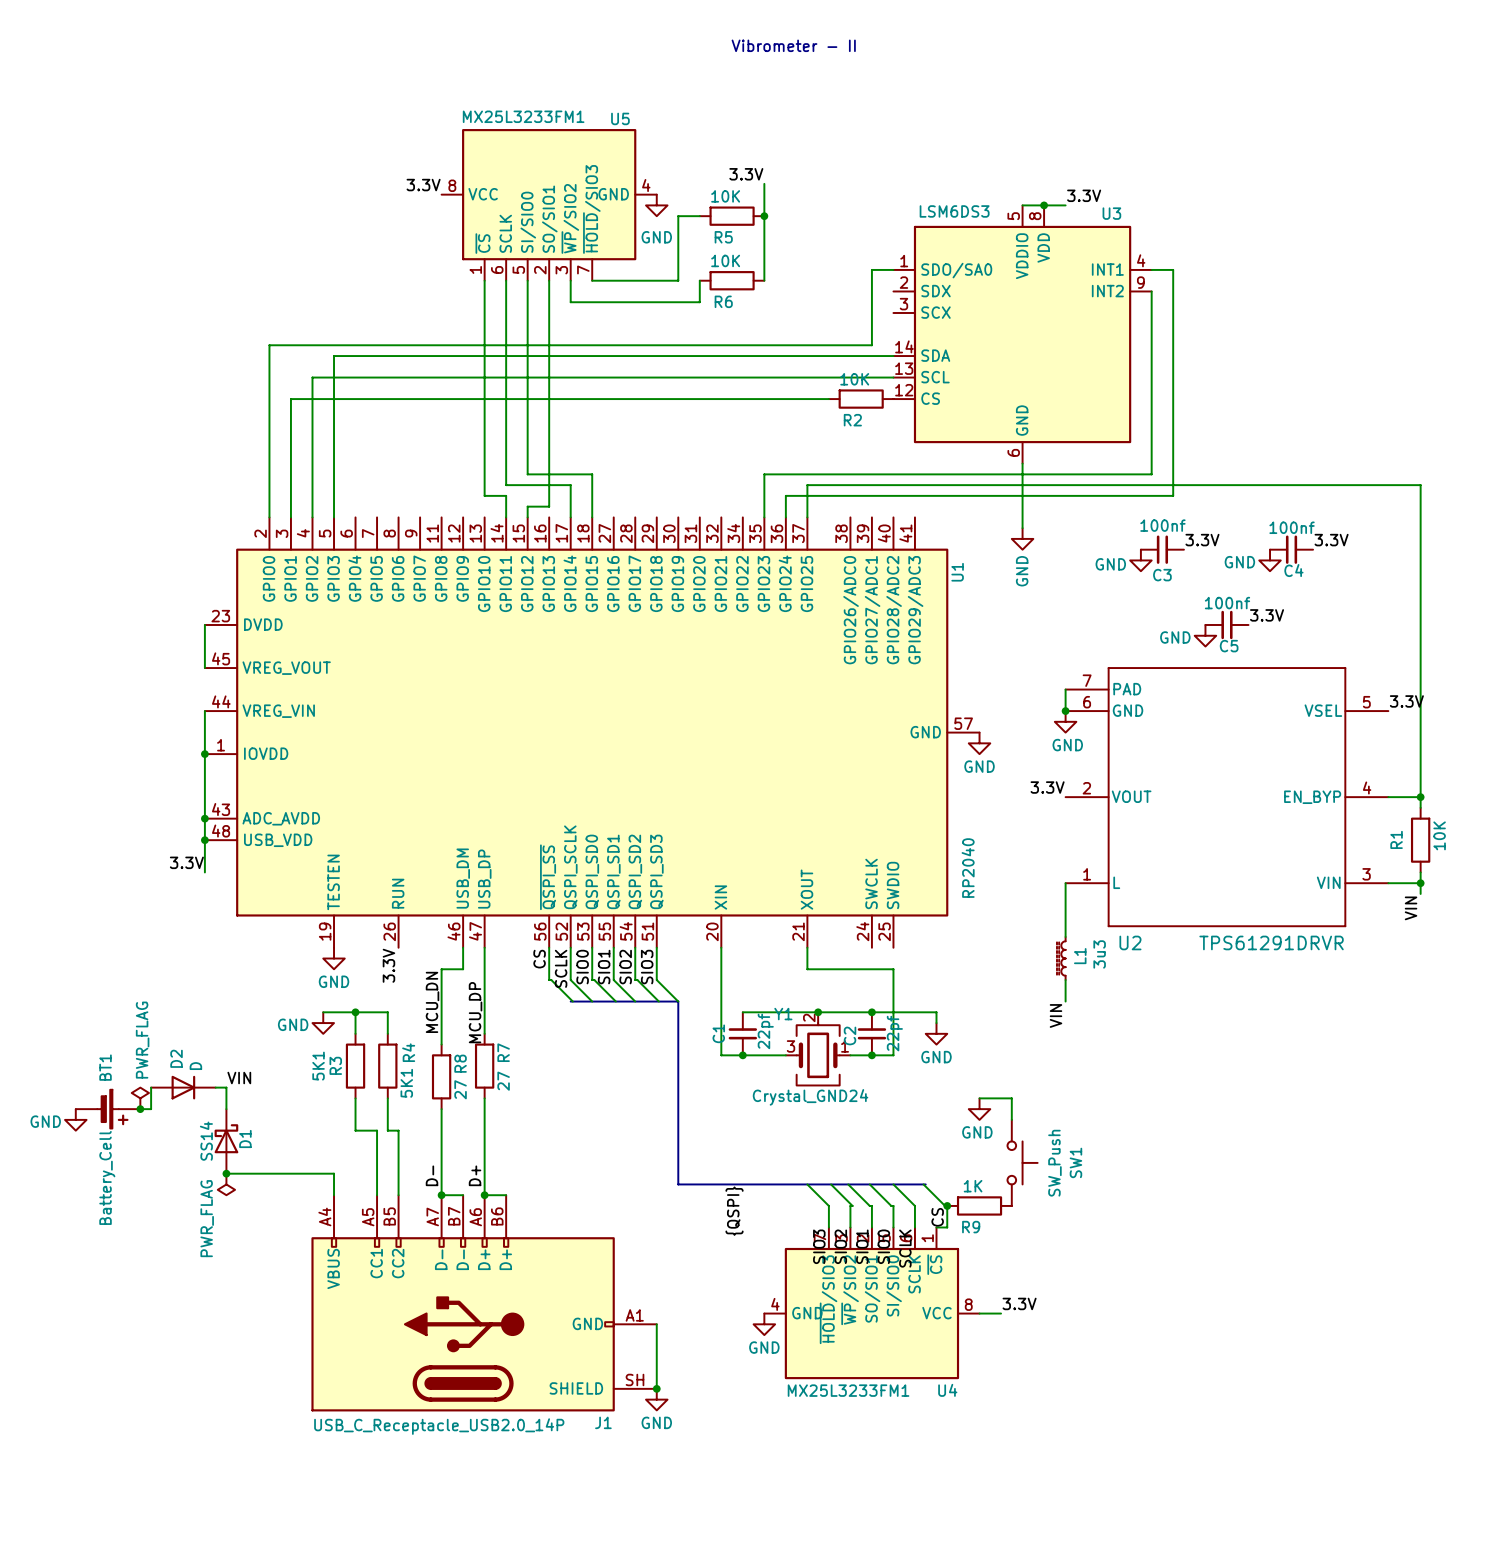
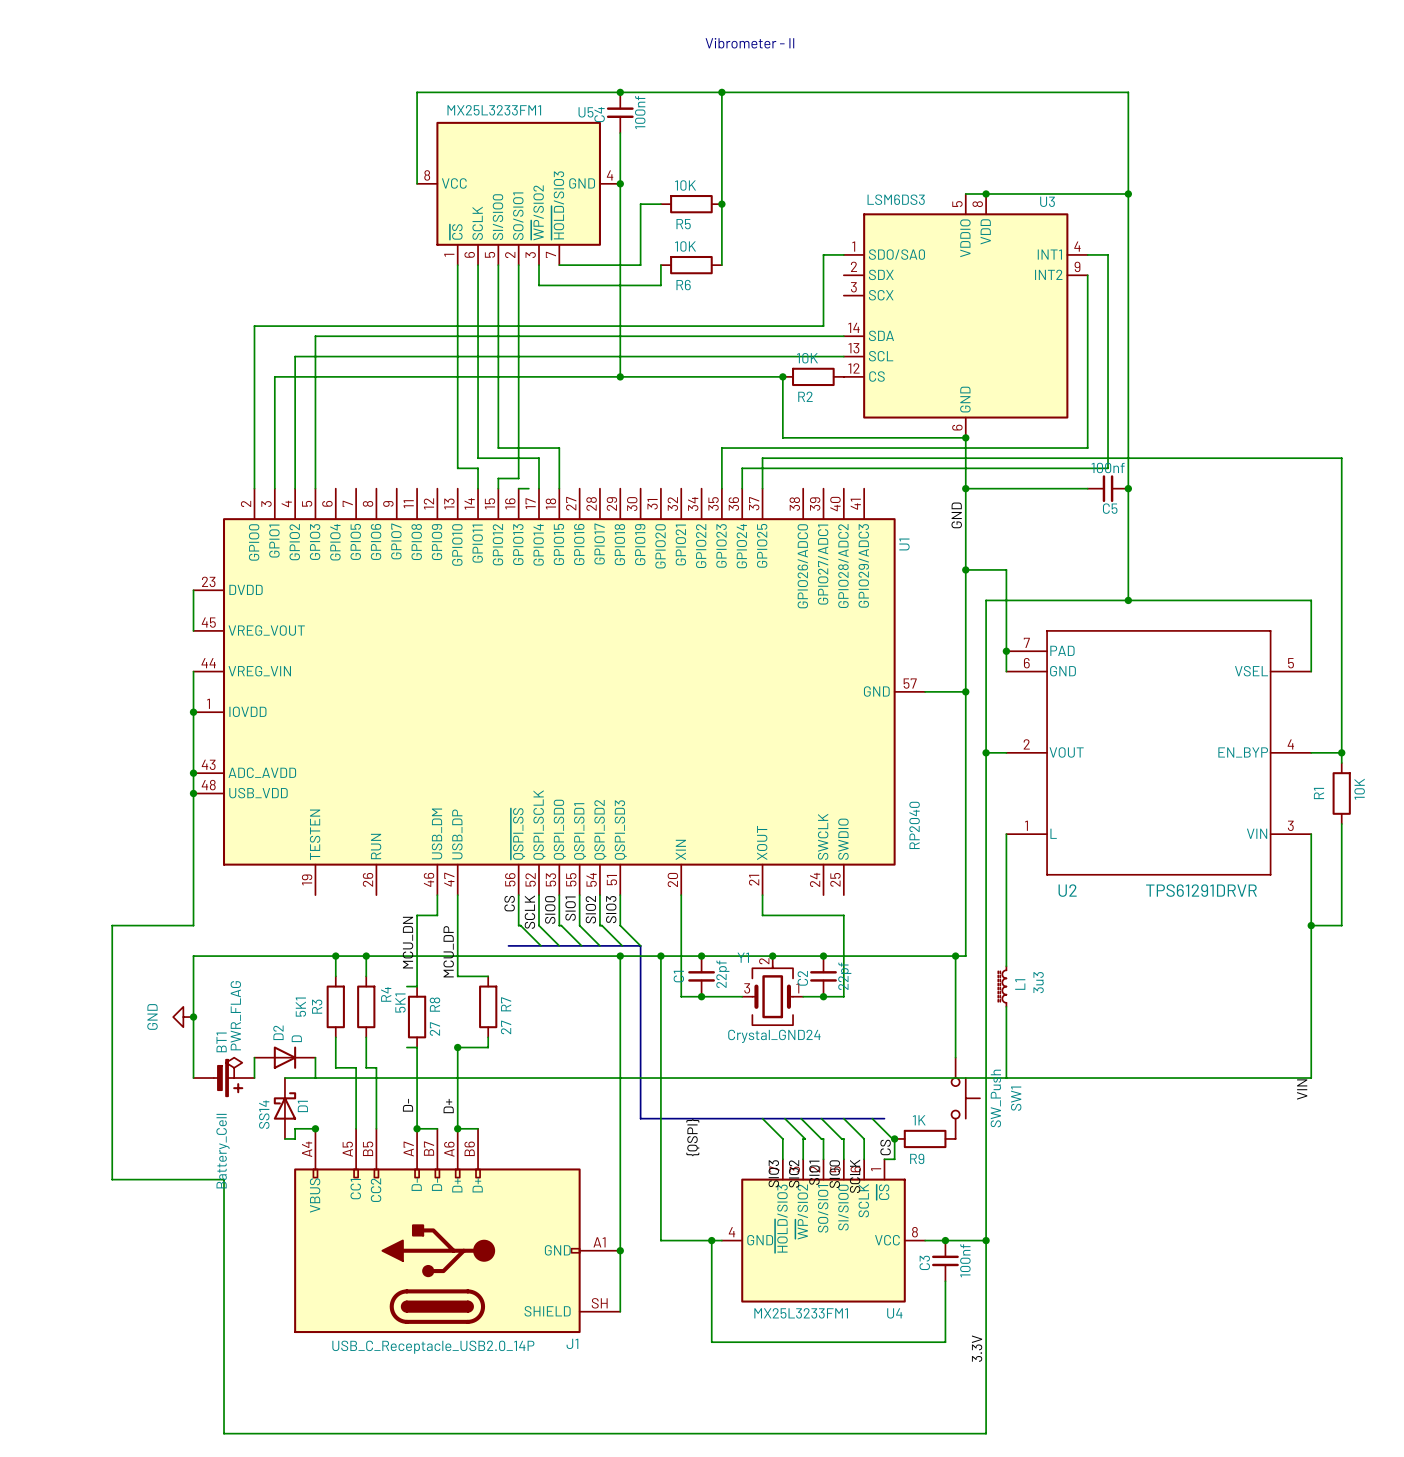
junction: none -> (620, 92)
wire: none -> (721, 92) (721, 173)
junction: none -> (721, 92)
wire: none -> (620, 133) (620, 376)
label: 3.3V (746, 174) -> none
label: 3.3V (423, 185) -> none
wire: none -> (417, 183) (417, 92) (1128, 92) (1128, 600)
junction: none -> (620, 183)
label: 3.3V (1084, 195) -> none
power symbol: GND (656, 205) -> none
wire: none -> (1006, 193) (1128, 193)
junction: none -> (1128, 193)
junction: none -> (620, 376)
wire: none -> (782, 376) (782, 437) (965, 437)
junction: none -> (782, 376)
junction: none -> (965, 437)
wire: none -> (518, 488) (528, 488)
wire: none -> (965, 488) (1087, 488)
junction: none -> (965, 488)
junction: none -> (1128, 488)
power symbol: GND (1022, 538) -> none
label: 3.3V (1202, 540) -> none
label: 3.3V (1331, 540) -> none
label: none -> GND (956, 515)
C3 rotation: 0° (1162, 549) -> 90° clockwise (945, 1260)
C3 position: (1162, 549) -> (945, 1260)
C4 rotation: 0° (1291, 549) -> 90° clockwise (620, 112)
C4 position: (1291, 549) -> (620, 112)
power symbol: GND (1140, 560) -> none
power symbol: GND (1270, 560) -> none
wire: none -> (965, 569) (1006, 569) (1006, 651)
junction: none -> (965, 569)
label: 3.3V (1267, 615) -> none
C5 position: (1226, 624) -> (1108, 488)
junction: none -> (1128, 600)
power symbol: GND (1205, 635) -> none
label: 3.3V (1406, 701) -> none
junction position: (1065, 711) -> (1006, 651)
wire: none -> (1311, 671) (1311, 600) (986, 600) (986, 1433) (224, 1433) (224, 1179) (112, 1179) (112, 925) (193, 925) (193, 823)
power symbol: GND (1065, 721) -> none
wire: none -> (925, 691) (965, 691)
junction: none -> (965, 691)
power symbol: GND (979, 743) -> none
label: 3.3V (1047, 787) -> none
wire: none -> (986, 752) (1006, 752)
junction: none -> (986, 752)
label: 3.3V (186, 862) -> none
wire: (1388, 883) (1420, 883) -> (1311, 834) (1311, 1078) (284, 1078)
junction: (1420, 883) -> none
wire: none -> (1341, 844) (1341, 925) (1311, 925)
label: VIN (1411, 908) -> none
wire: none -> (1006, 884) (1006, 925)
power symbol: GND (334, 958) -> none
L1 position: (1061, 958) -> (1002, 986)
label: 3.3V (388, 965) -> none
junction: none -> (1311, 925)
bus: none -> (508, 945) (539, 945)
wire: none -> (1006, 945) (1006, 966)
wire: none -> (305, 956) (193, 956) (193, 1078)
wire: none -> (366, 956) (701, 956)
junction: none -> (366, 956)
wire: none -> (620, 956) (620, 1250)
junction: none -> (620, 956)
wire: none -> (660, 956) (660, 1240) (721, 1240)
junction: none -> (660, 956)
junction: none -> (701, 956)
wire: (936, 1012) (936, 1023) -> (884, 956) (965, 956) (965, 498)
junction: none -> (955, 956)
label: VIN (1056, 1015) -> none
power symbol: GND (323, 1023) -> none
wire: none -> (457, 976) (488, 976)
power symbol: GND (936, 1033) -> none
wire: none -> (406, 986) (417, 986)
R7 name position: R7 (503, 1052) -> R7 (506, 1004)
R7 position: (484, 1066) -> (488, 1006)
wire: none -> (1006, 1006) (1006, 1078)
power symbol: none -> GND (183, 1017)
junction: none -> (193, 1017)
label: VIN (239, 1078) -> none
R7 value position: 27 (503, 1081) -> 27 (506, 1027)
R4 value position: 5K1 (406, 1083) -> 5K1 (400, 1003)
wire: (151, 1087) (151, 1109) (140, 1109) -> none
D2 position: (183, 1087) -> (284, 1057)
wire: (215, 1087) (226, 1087) (226, 1109) -> none
power symbol: PWR_FLAG (140, 1098) -> none
wire: (484, 1098) (484, 1106) -> none
wire: none -> (488, 1037) (488, 1047) (457, 1047)
wire: (979, 1098) (1011, 1098) -> (955, 956) (955, 1037)
BT1 position: (108, 1109) -> (224, 1078)
junction: (140, 1109) -> none
wire: none -> (406, 1047) (417, 1047)
junction: none -> (457, 1047)
power symbol: GND (979, 1109) -> none
power symbol: GND (75, 1119) -> none
wire: none -> (254, 1057) (254, 1078)
wire: none -> (315, 1057) (315, 1078)
power symbol: none -> PWR_FLAG (234, 1067)
D1 value position: SS14 (206, 1141) -> SS14 (264, 1114)
D1 position: (226, 1141) -> (284, 1108)
label: none -> VIN (1302, 1089)
wire: (226, 1173) (334, 1173) (334, 1195) -> (284, 1138) (295, 1138) (295, 1128) (315, 1128)
junction: (226, 1173) -> none
power symbol: PWR_FLAG (226, 1184) -> none
bus: none -> (874, 1118) (884, 1118)
junction: none -> (315, 1128)
label rotation: 0° (1019, 1303) -> 90° counterclockwise (977, 1348)
label position: 3.3V (1019, 1303) -> 3.3V (977, 1348)
wire: none -> (711, 1240) (711, 1342) (945, 1342) (945, 1281)
junction: none -> (711, 1240)
wire: none -> (945, 1240) (986, 1240)
junction: none -> (945, 1240)
junction: none -> (986, 1240)
junction: none -> (620, 1250)
power symbol: GND (764, 1324) -> none
junction: (656, 1388) -> none
power symbol: GND (656, 1399) -> none

